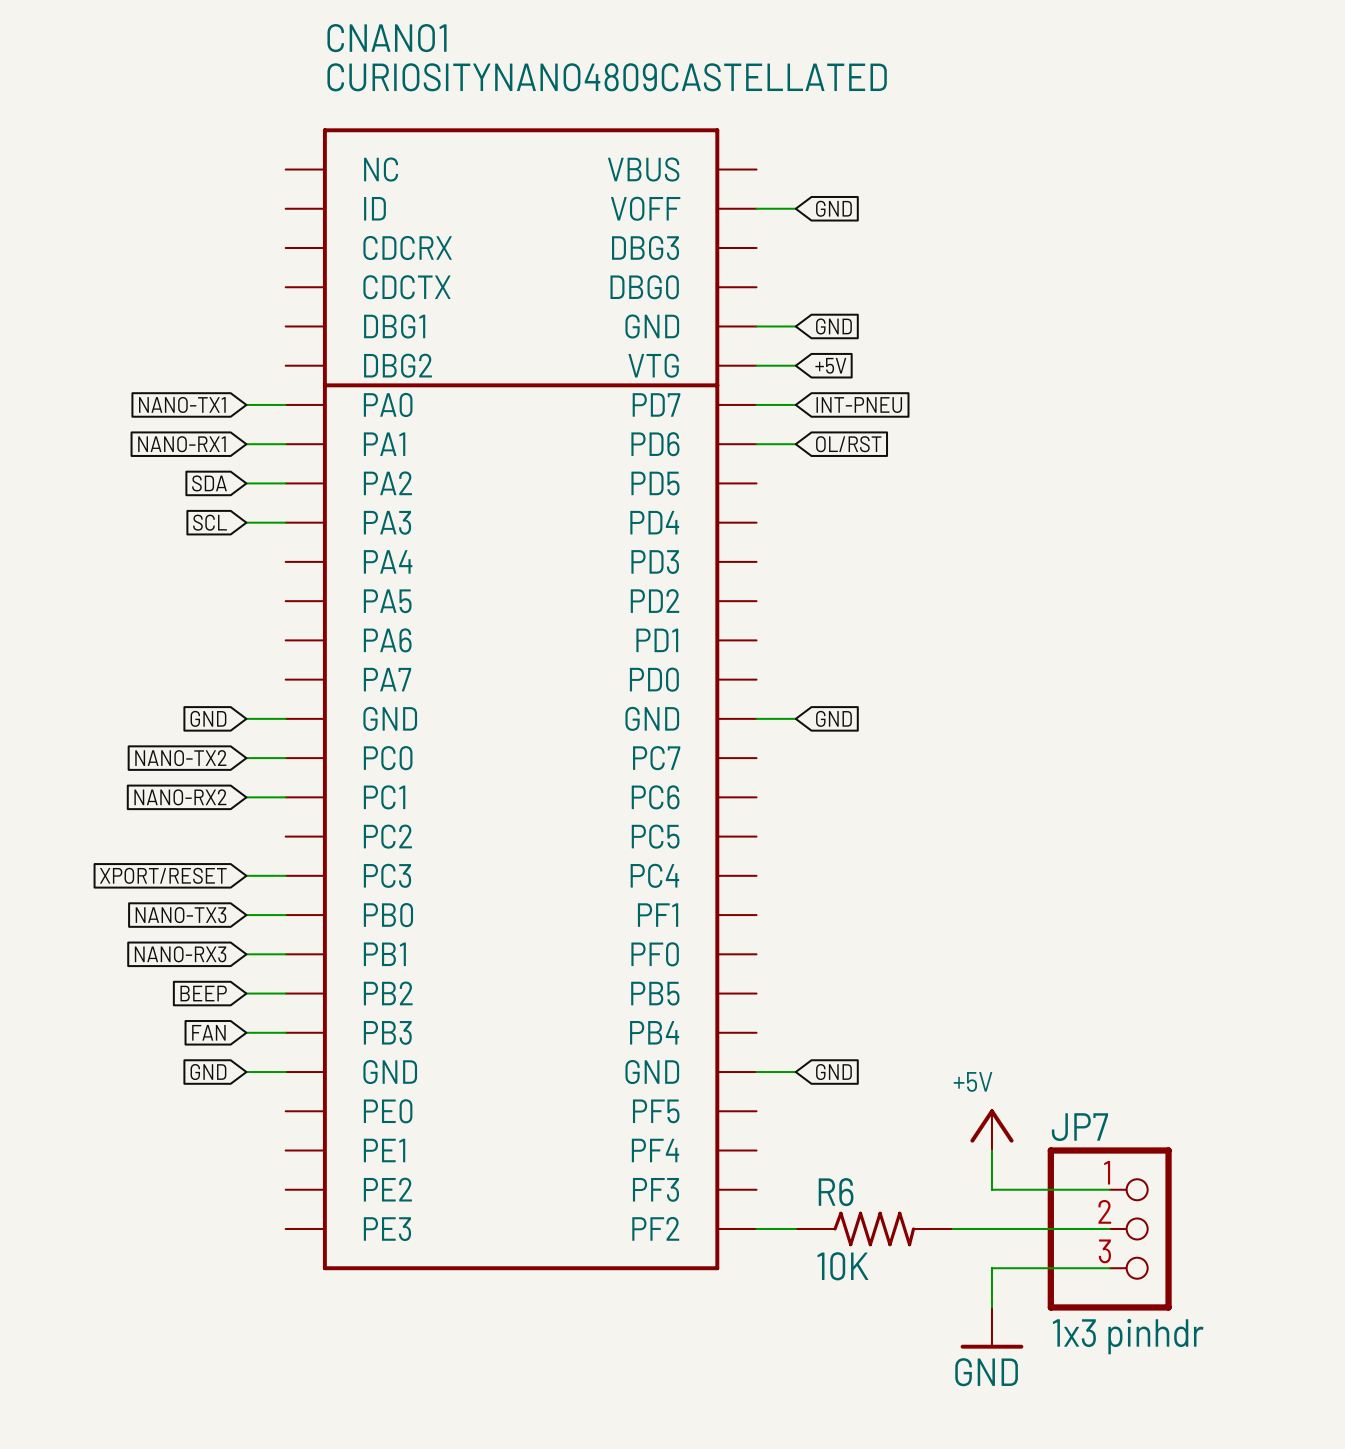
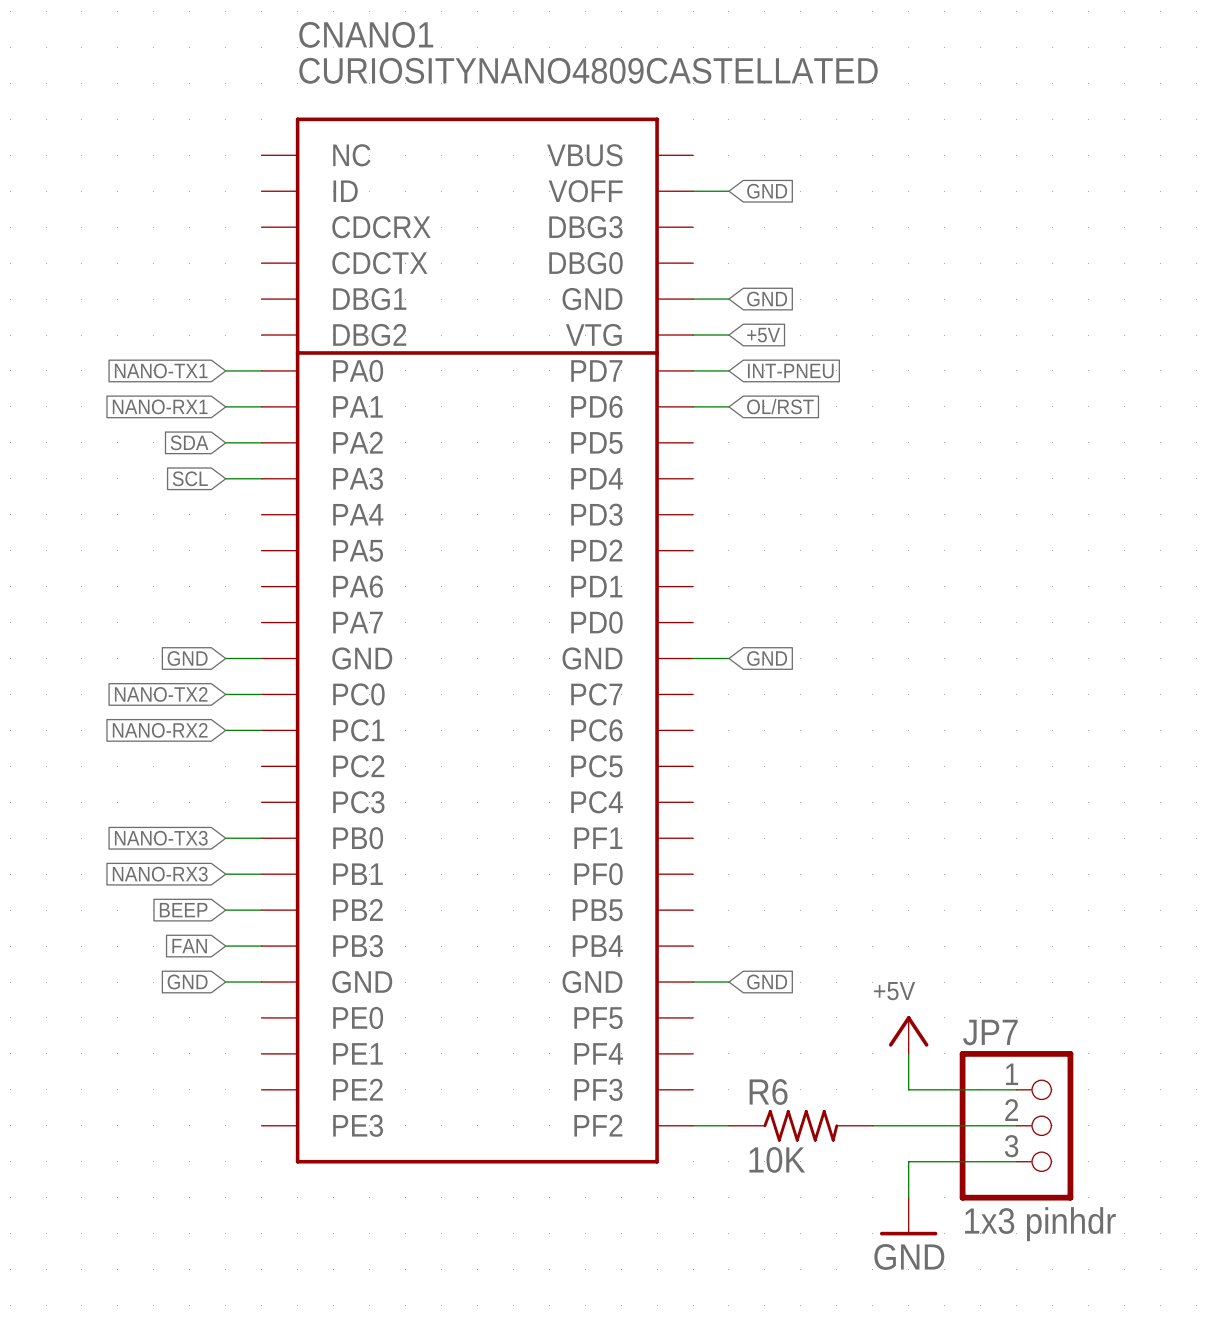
global label: XPORT/RESET (163, 875) -> none
wire: (246, 875) (285, 875) -> none

